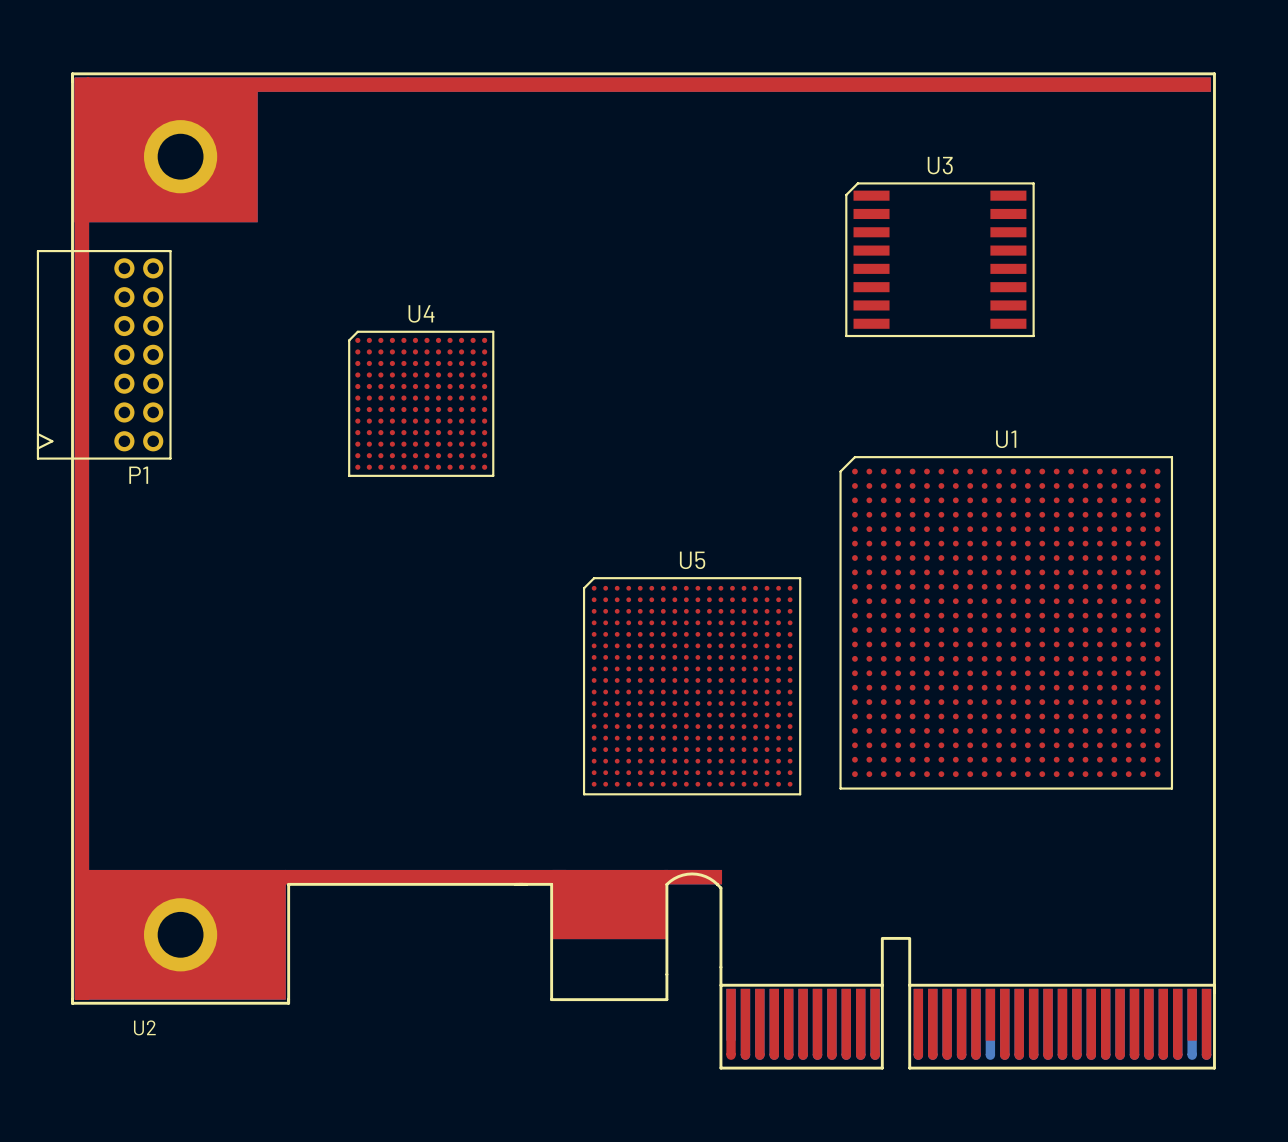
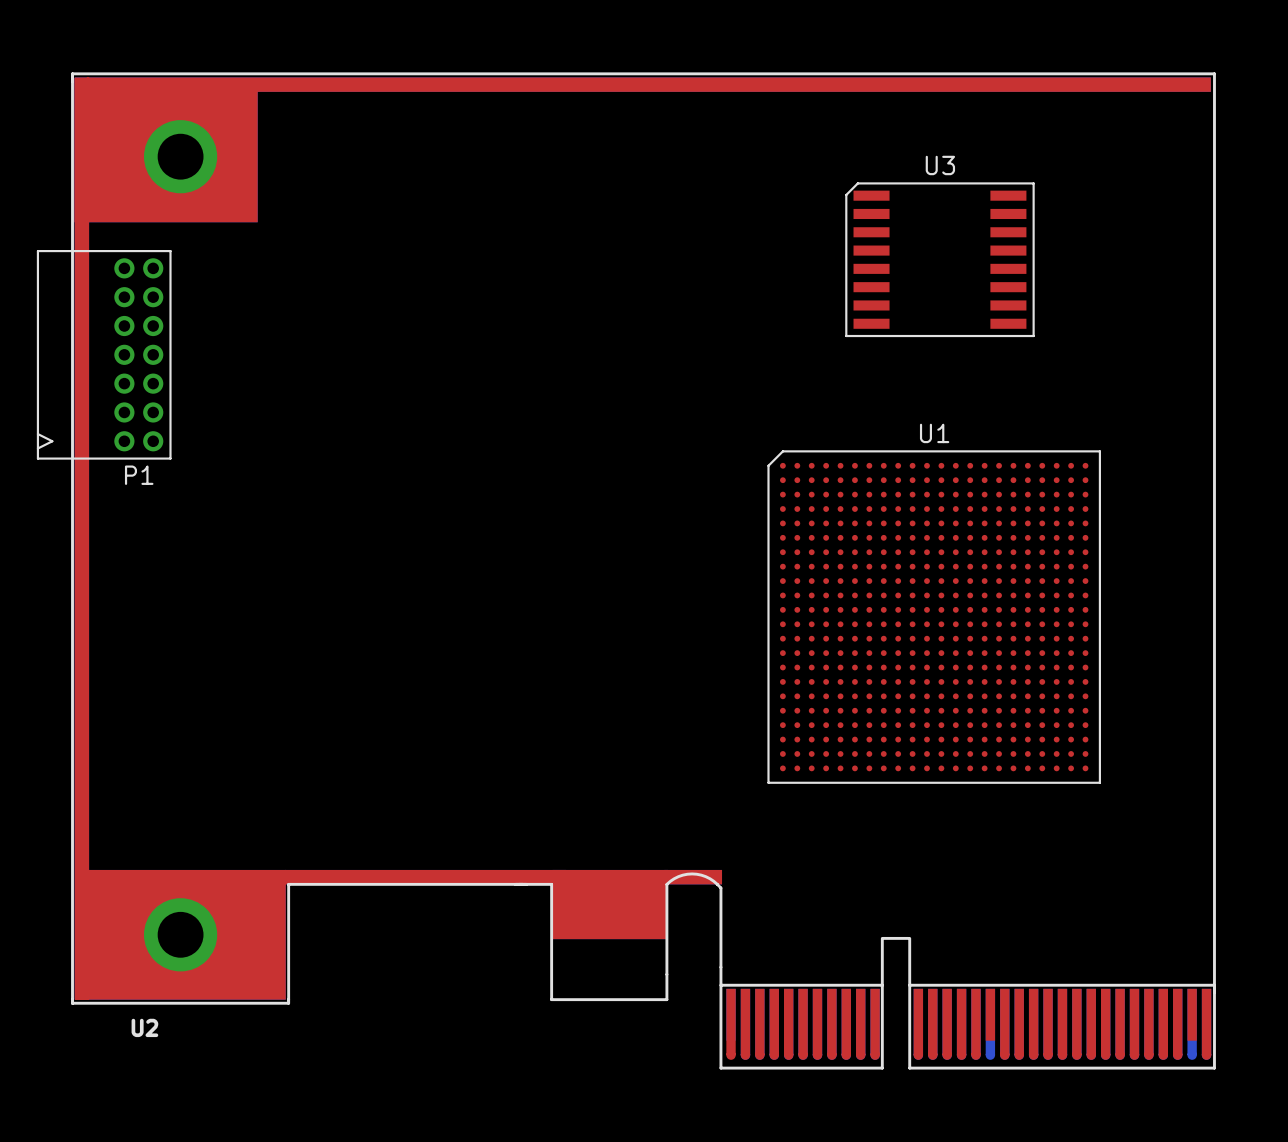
U4: (421, 403) -> none
U1 position: (1006, 622) -> (934, 617)
U5: (692, 686) -> none

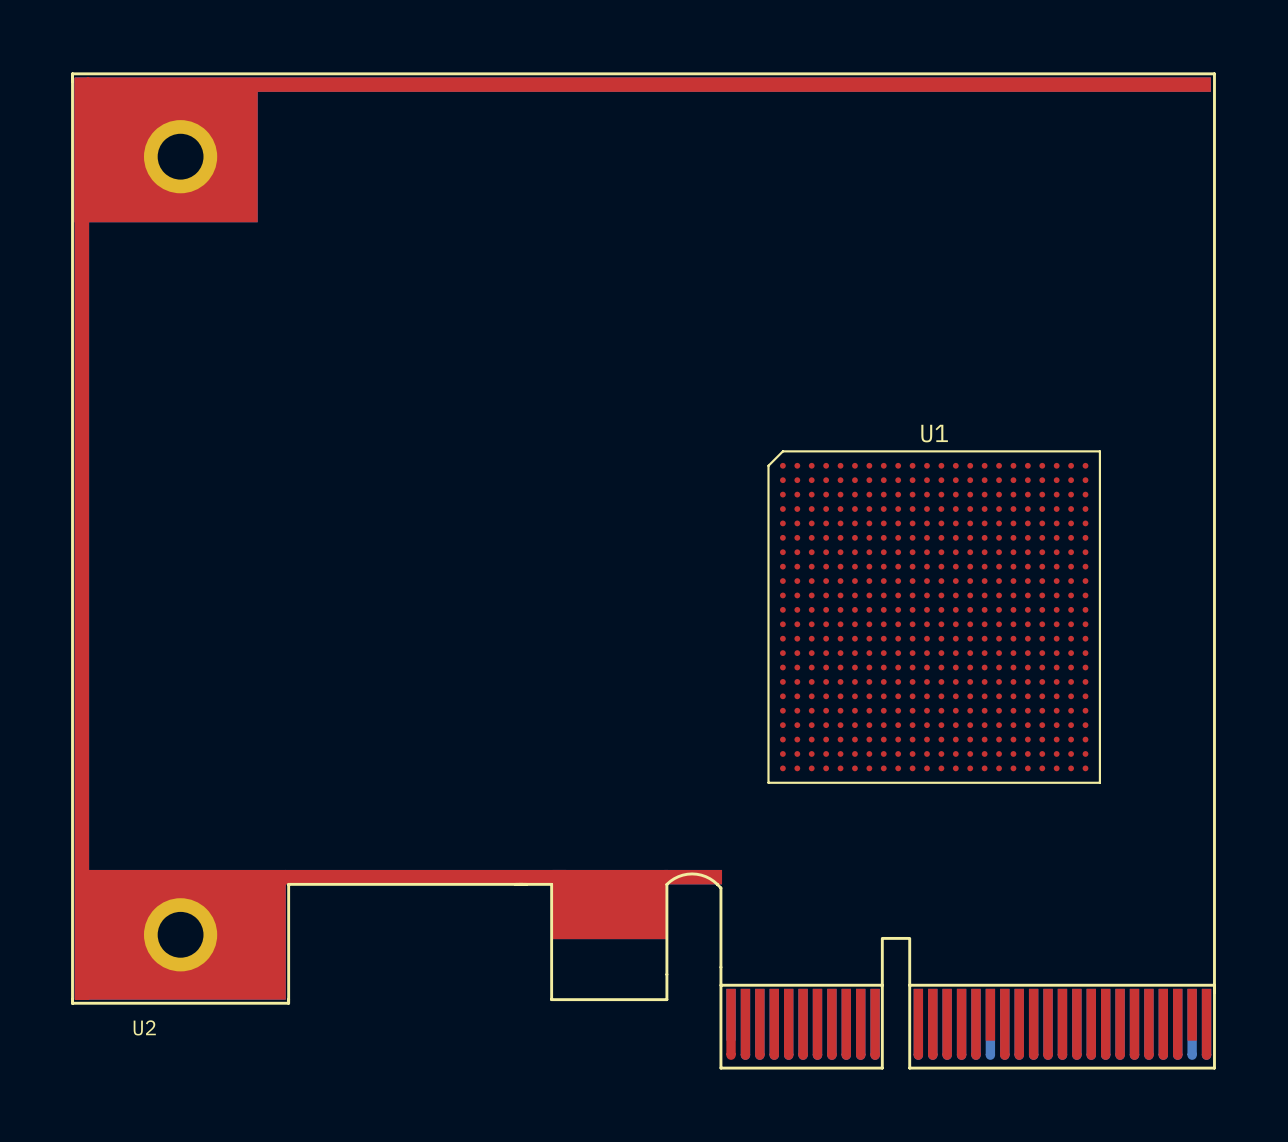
U3: (939, 259) -> none
P1: (104, 354) -> none

